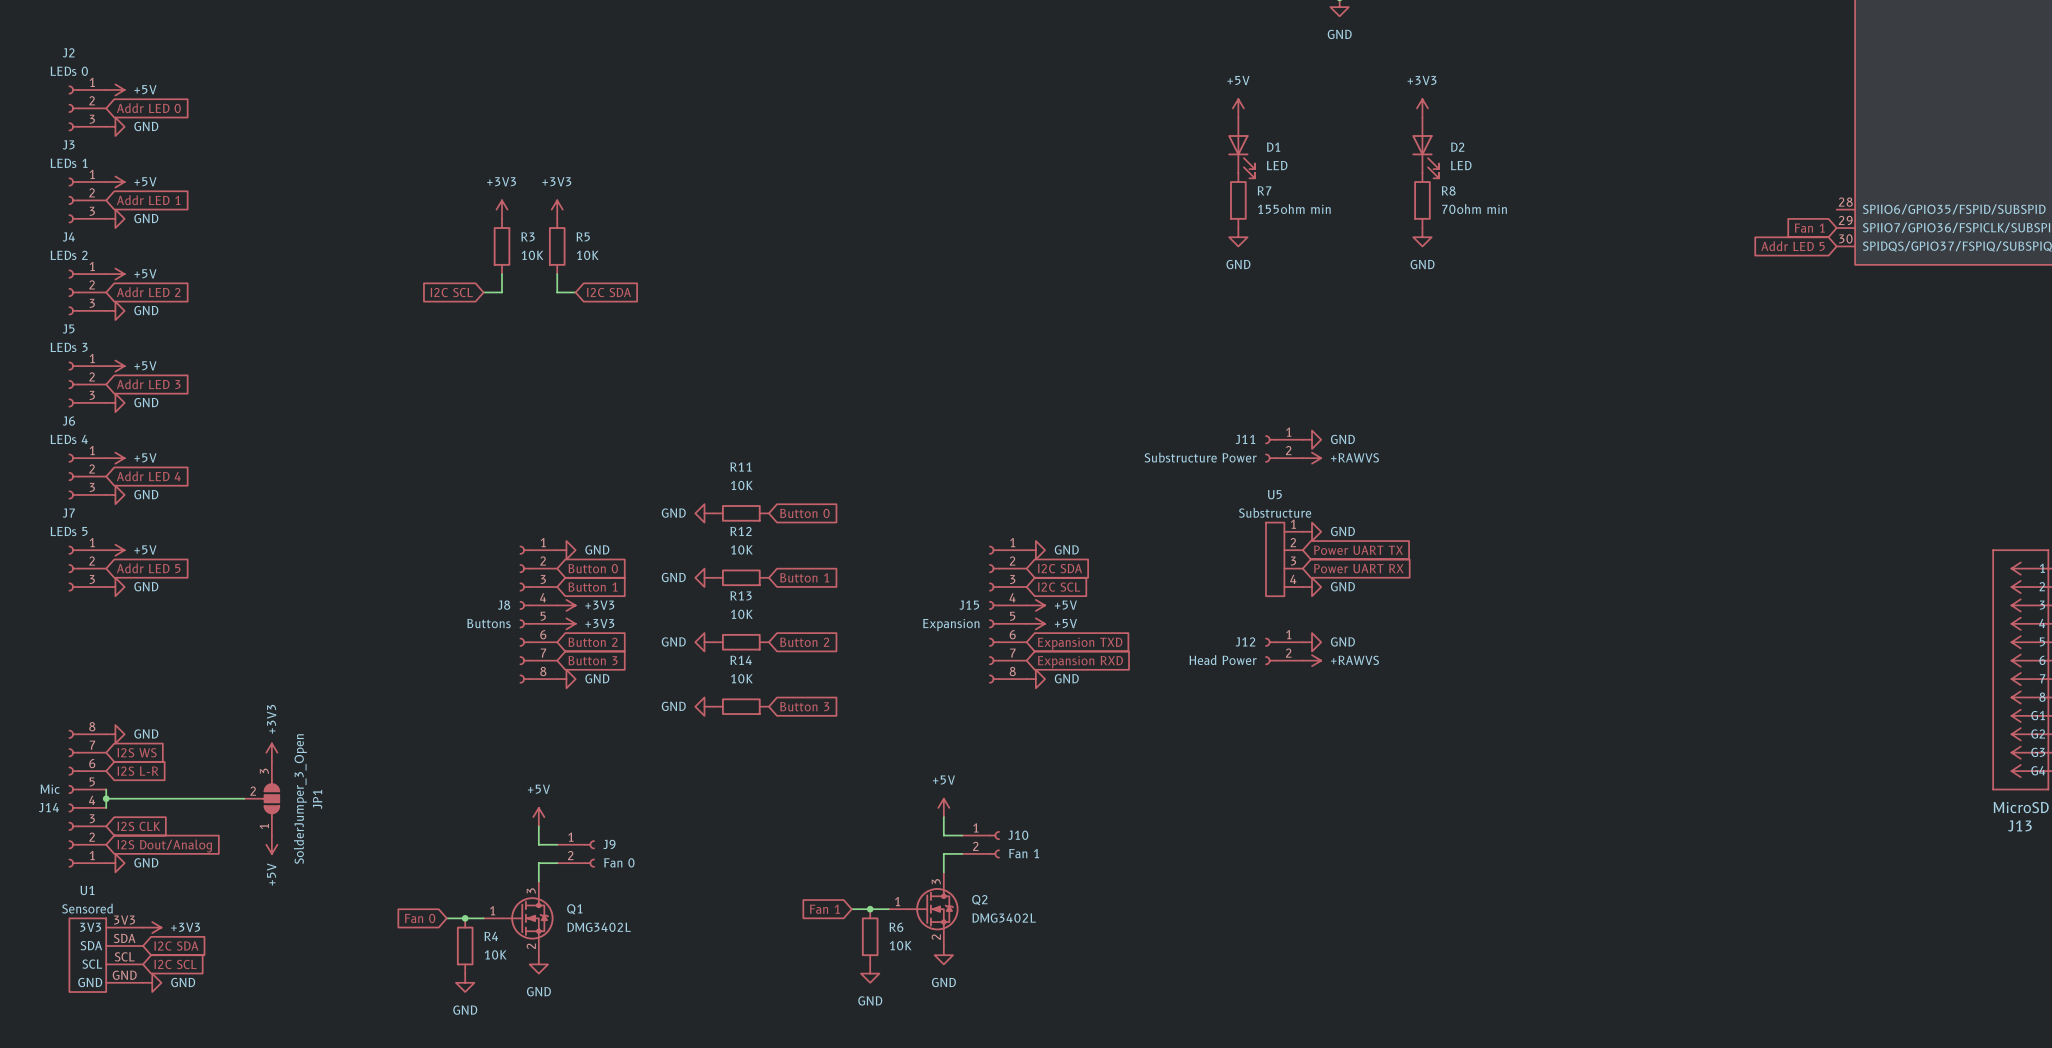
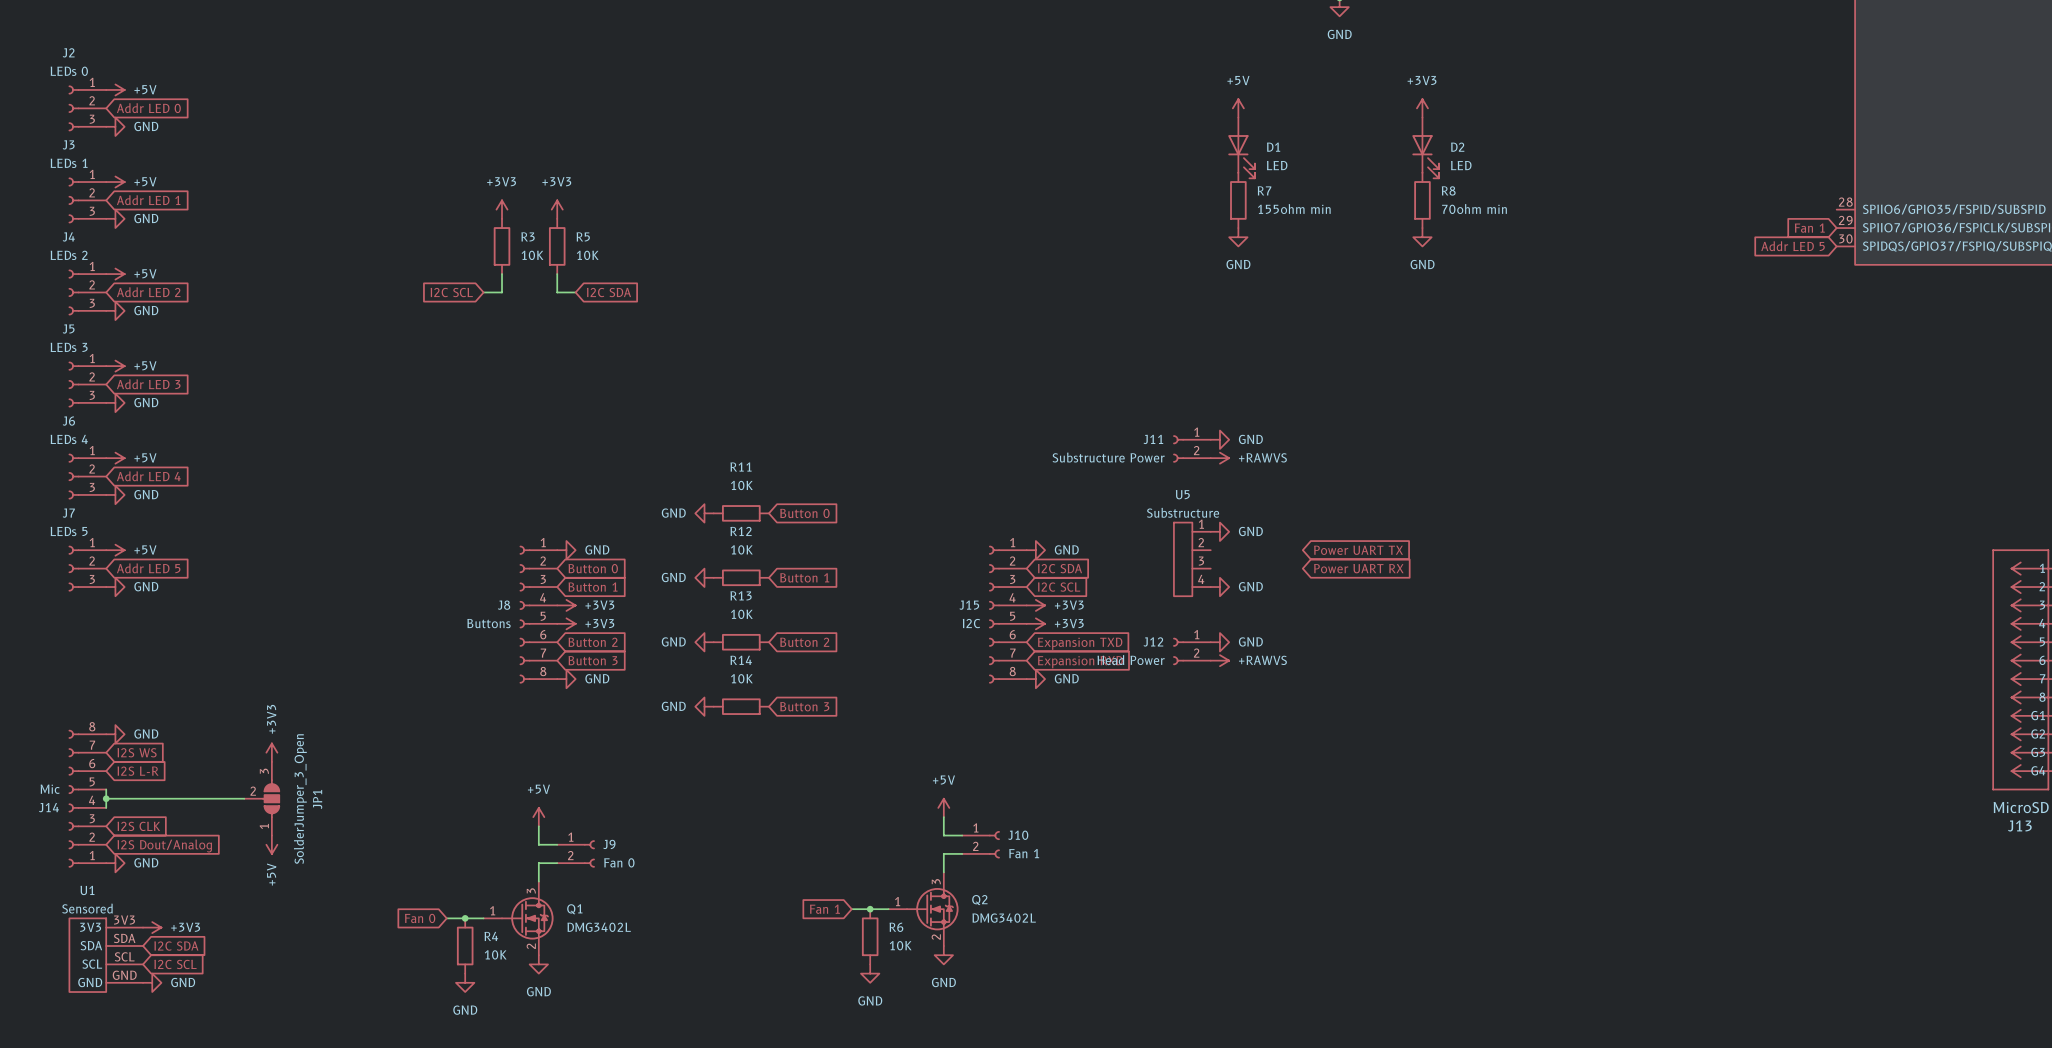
power symbol: none -> GND (1219, 439)
power symbol: GND (1312, 439) -> none
J11 position: (1284, 448) -> (1192, 448)
power symbol position: +RAWVS (1312, 458) -> +RAWVS (1219, 458)
power symbol: none -> GND (1219, 531)
power symbol: GND (1312, 531) -> none
U5 position: (1284, 559) -> (1192, 559)
power symbol: none -> GND (1219, 587)
power symbol: GND (1312, 587) -> none
power symbol: +5V (1035, 605) -> +3V3 (1035, 605)
power symbol: +5V (1035, 623) -> +3V3 (1035, 623)
J15 value: Expansion (951, 625) -> I2C (971, 623)
power symbol: none -> GND (1219, 642)
power symbol: GND (1312, 642) -> none
J12 position: (1284, 651) -> (1192, 651)
power symbol position: +RAWVS (1312, 660) -> +RAWVS (1219, 660)

